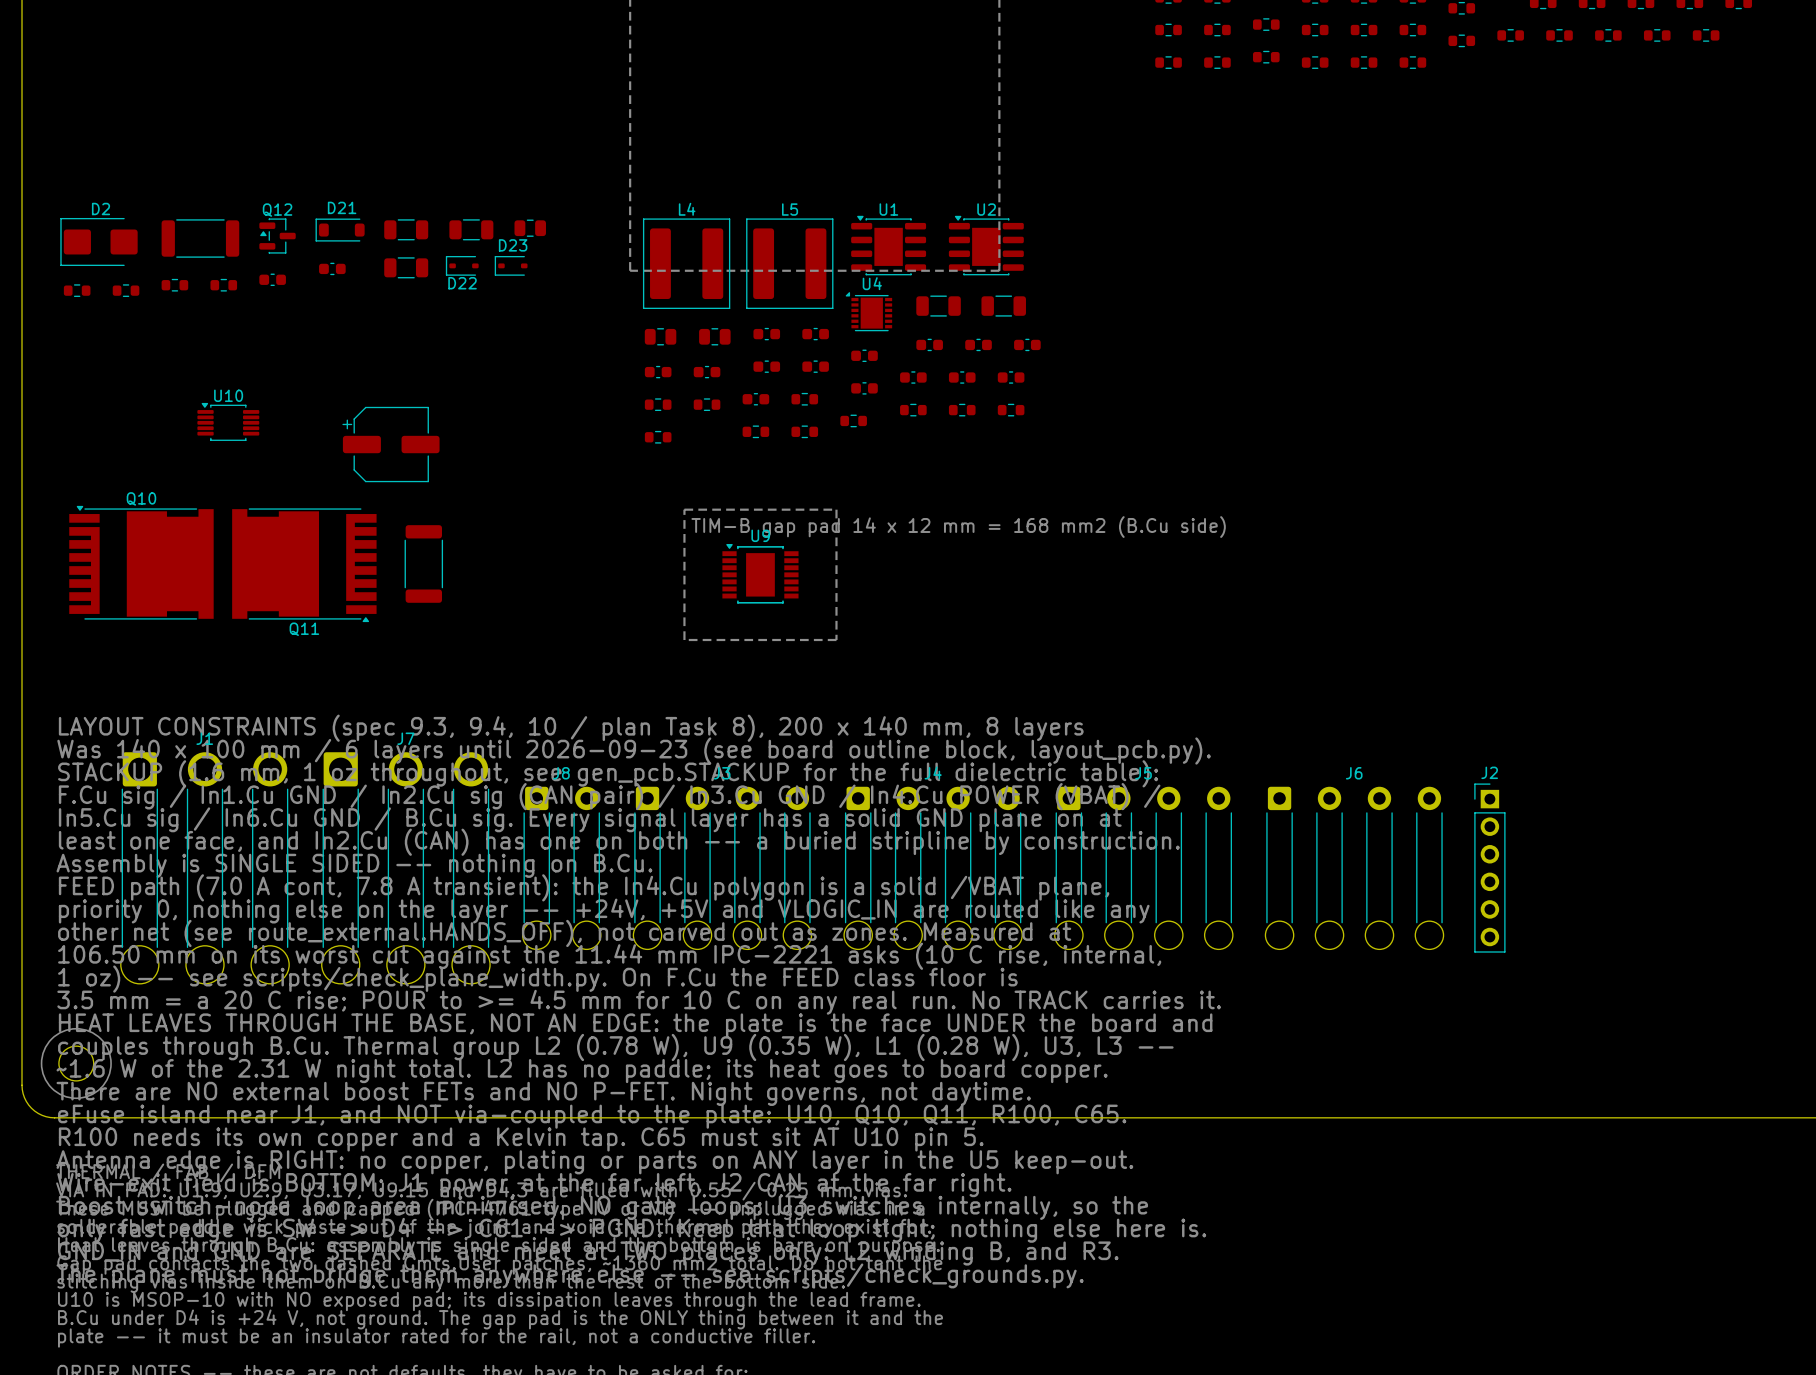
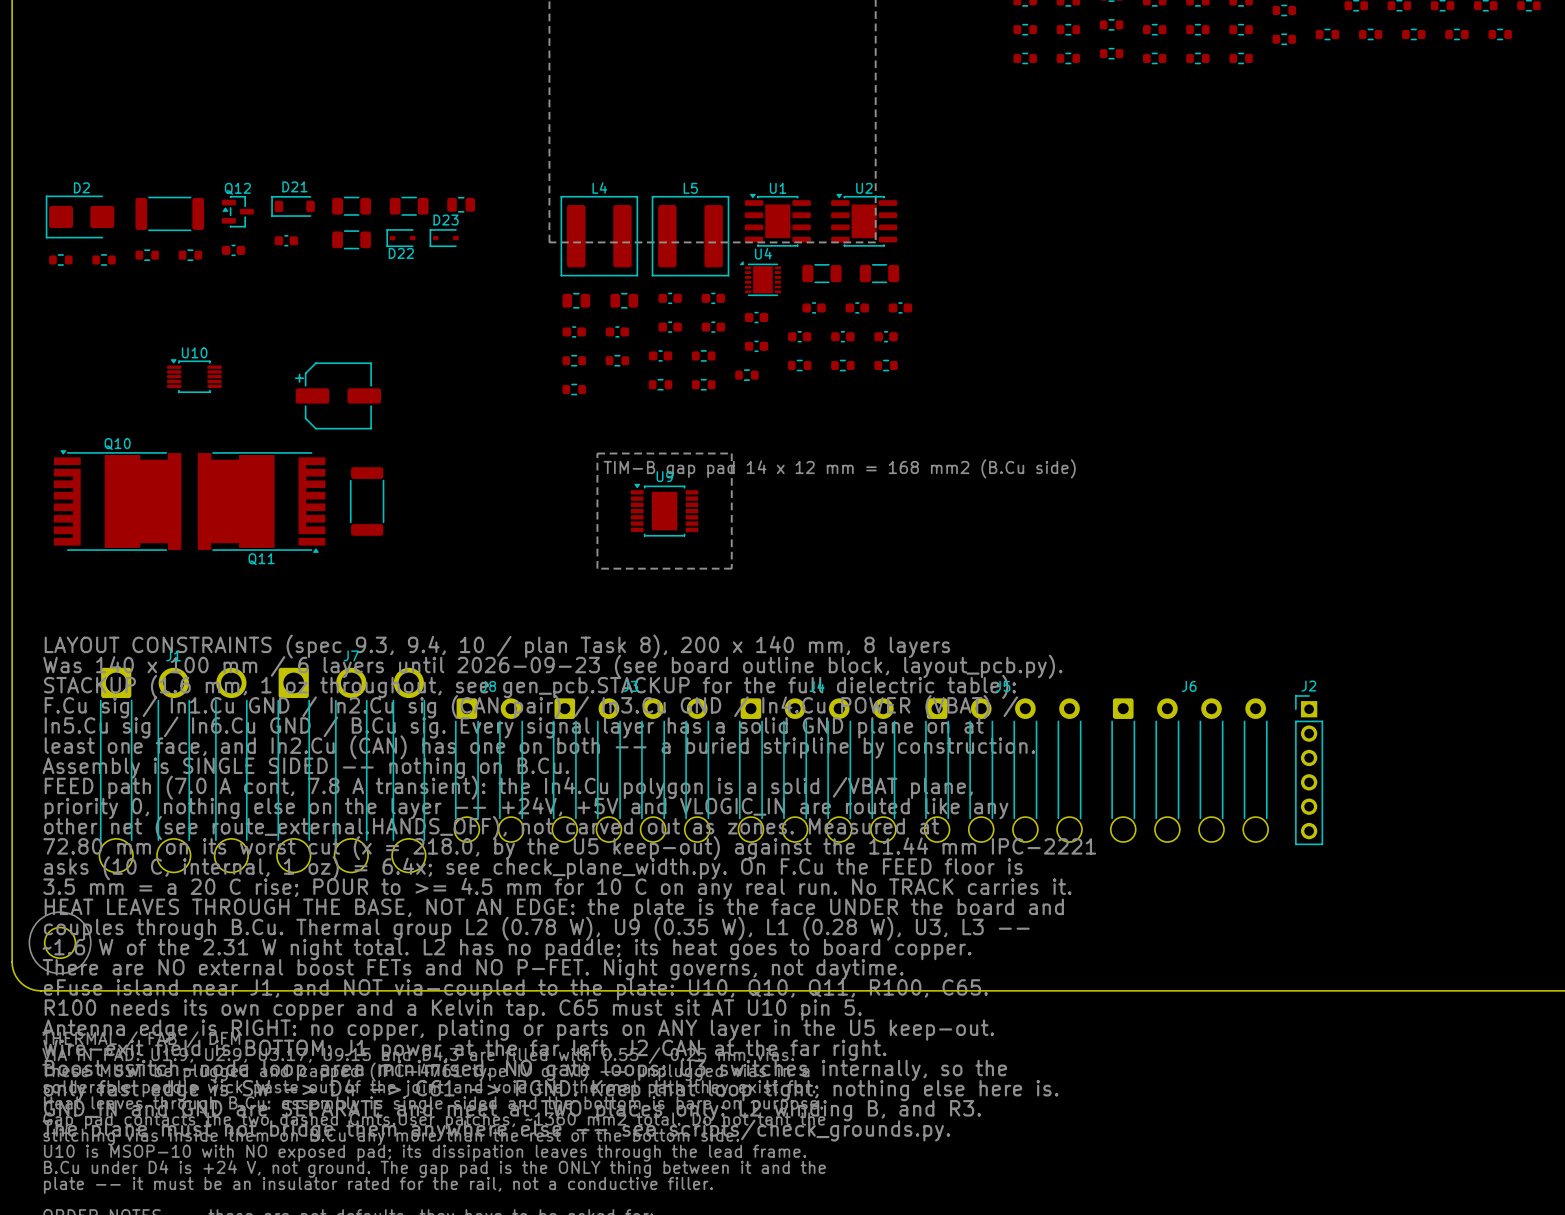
text: 106.50 mm on its worst cut against the 11.44 mm IPC-2221 asks (10 C rise, internal, (609, 956) -> 72.80 mm on its worst cut (x = 218.0, by the U5 keep-out) against the 11.44 mm IPC-2221 (569, 848)
text: 1 oz) -- see scripts/check_plane_width.py. On F.Cu the FEED class floor is (537, 979) -> asks (10 C, internal, 1 oz) = 6.4x; see check_plane_width.py. On F.Cu the FEED floor is (533, 868)

